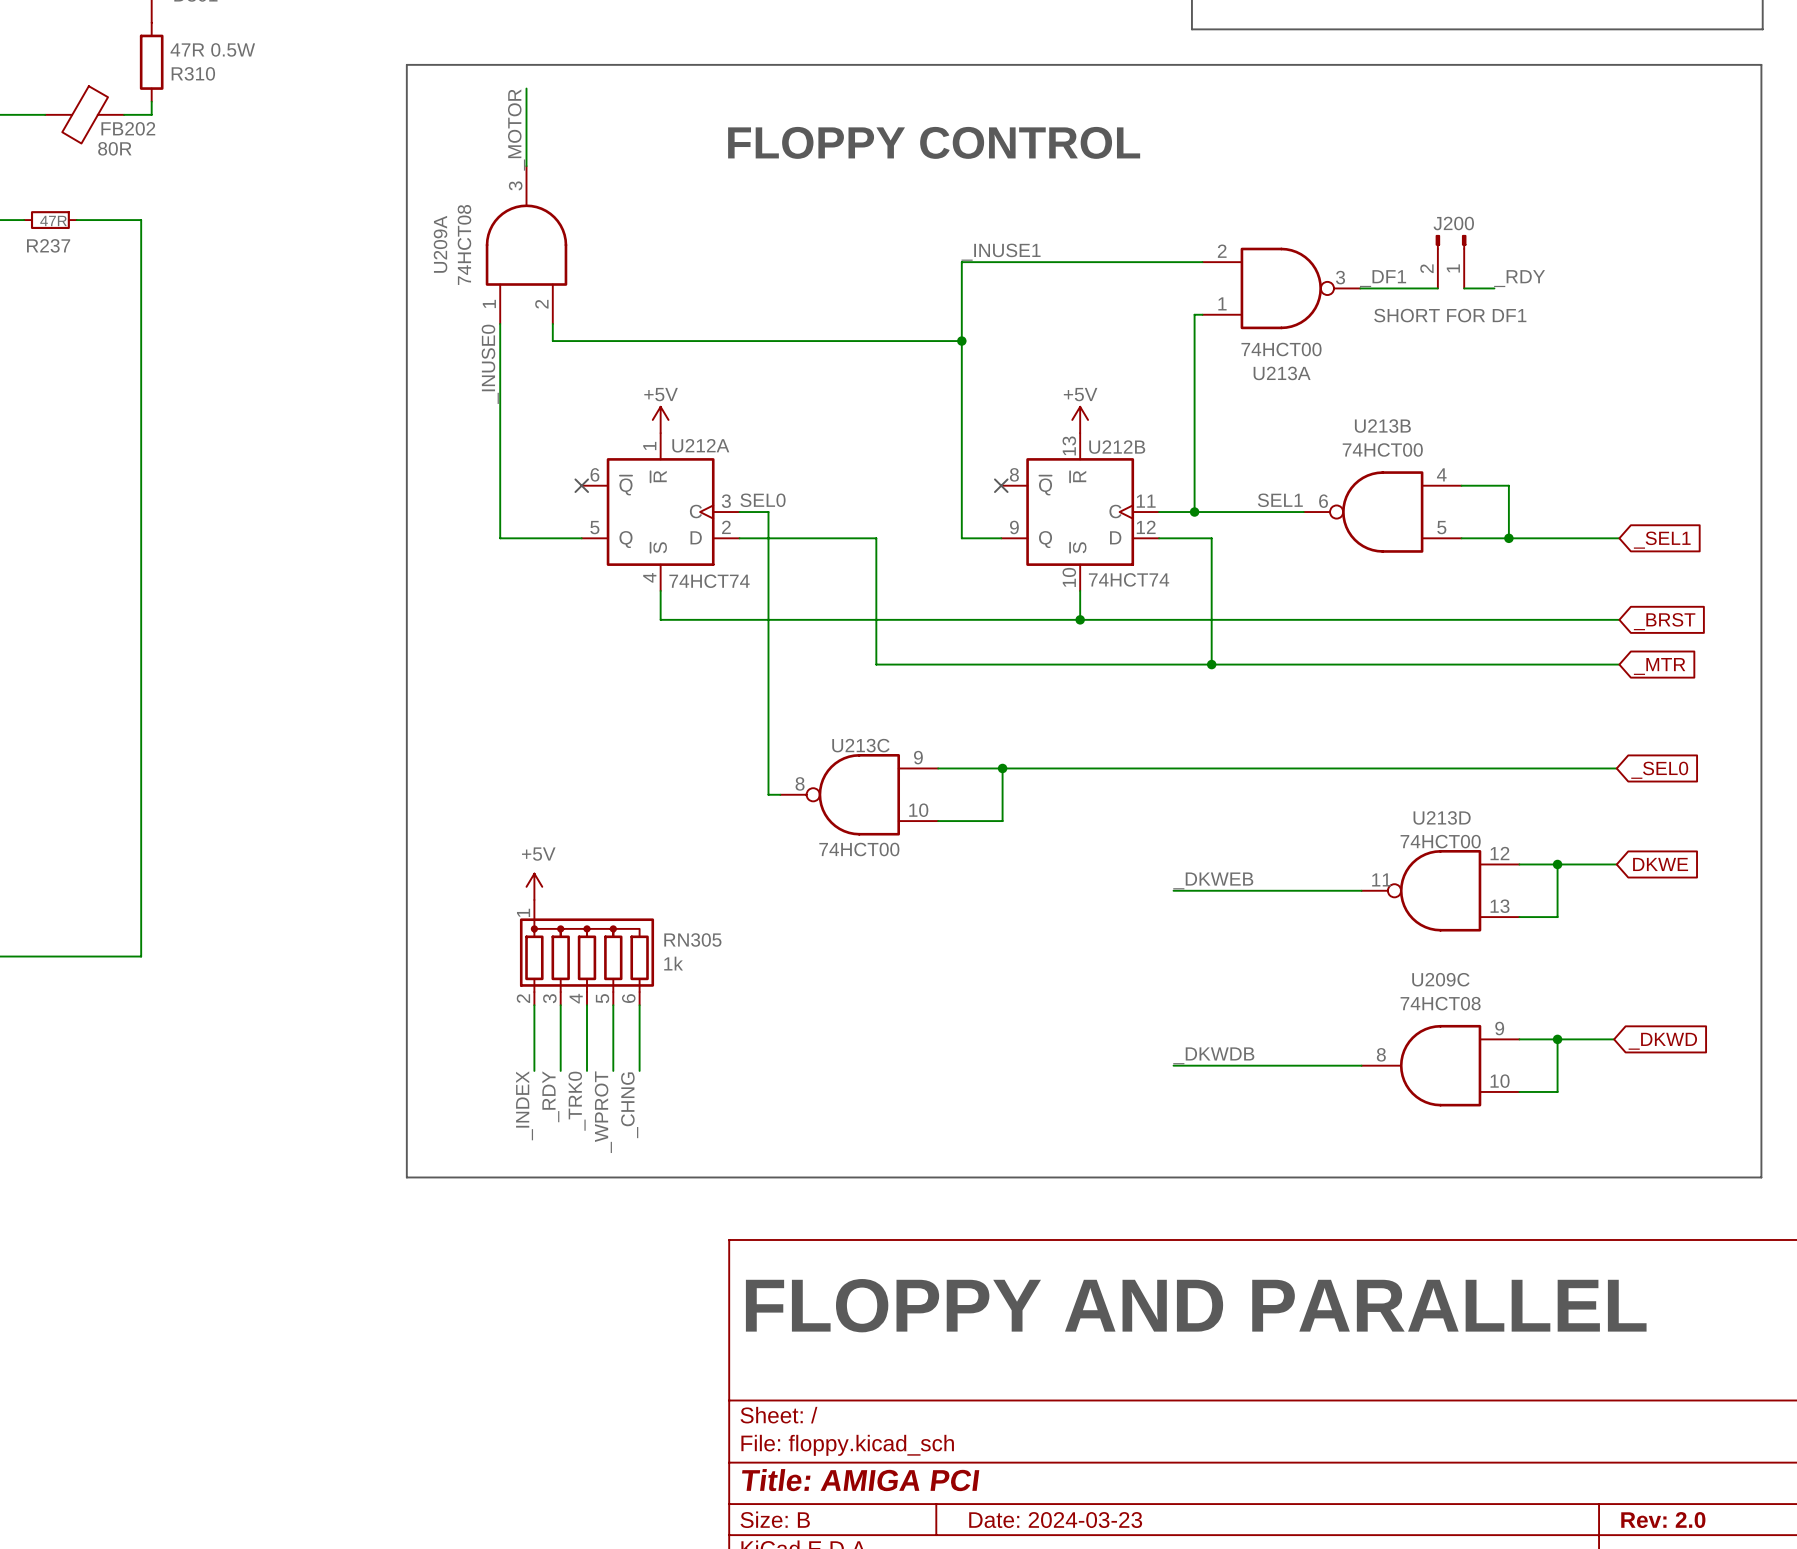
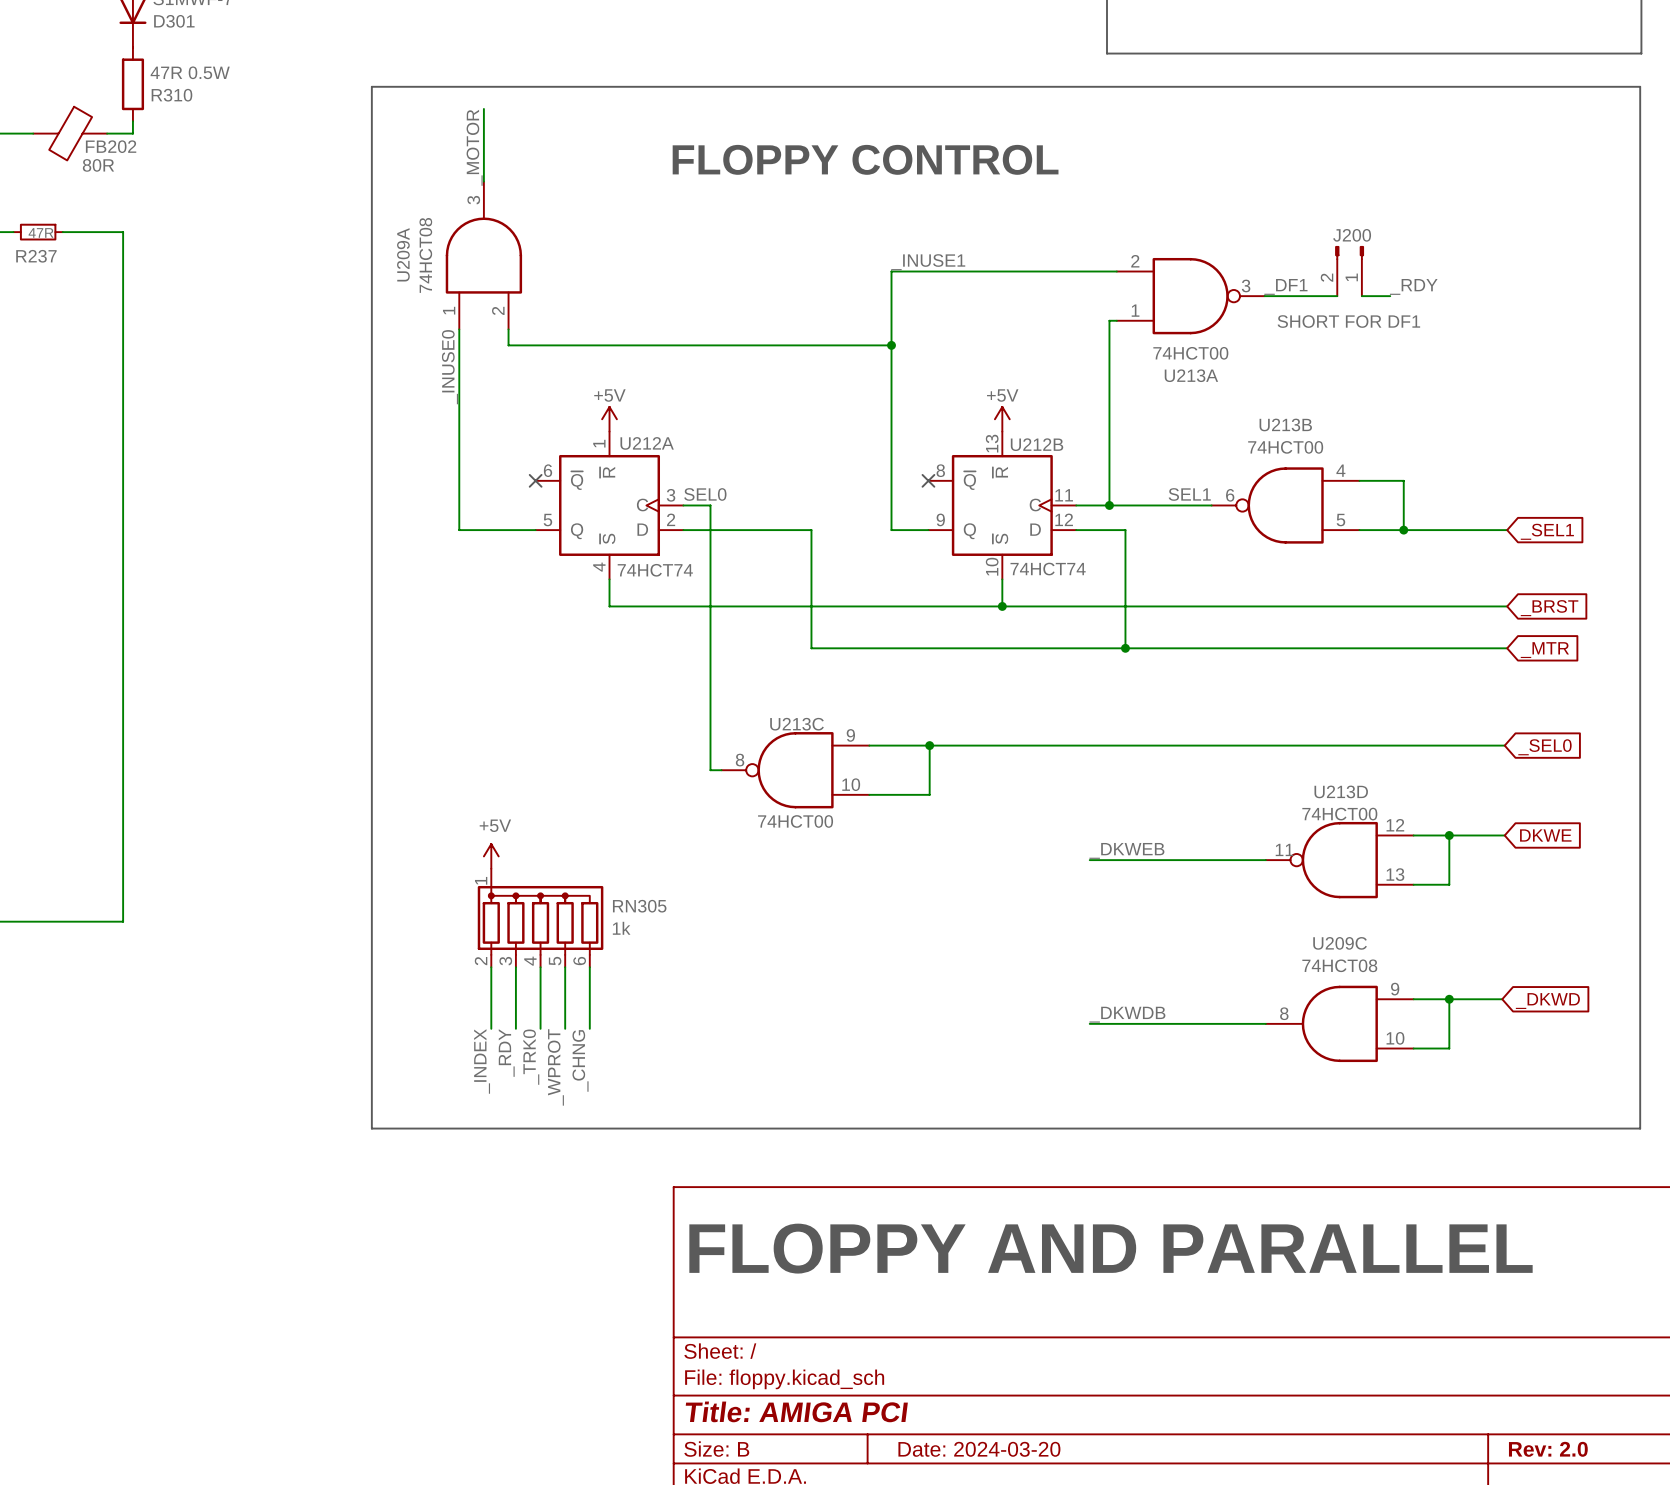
title block: Date: 2024-03-23 (1055, 1520) -> Date: 2024-03-20 (979, 1449)

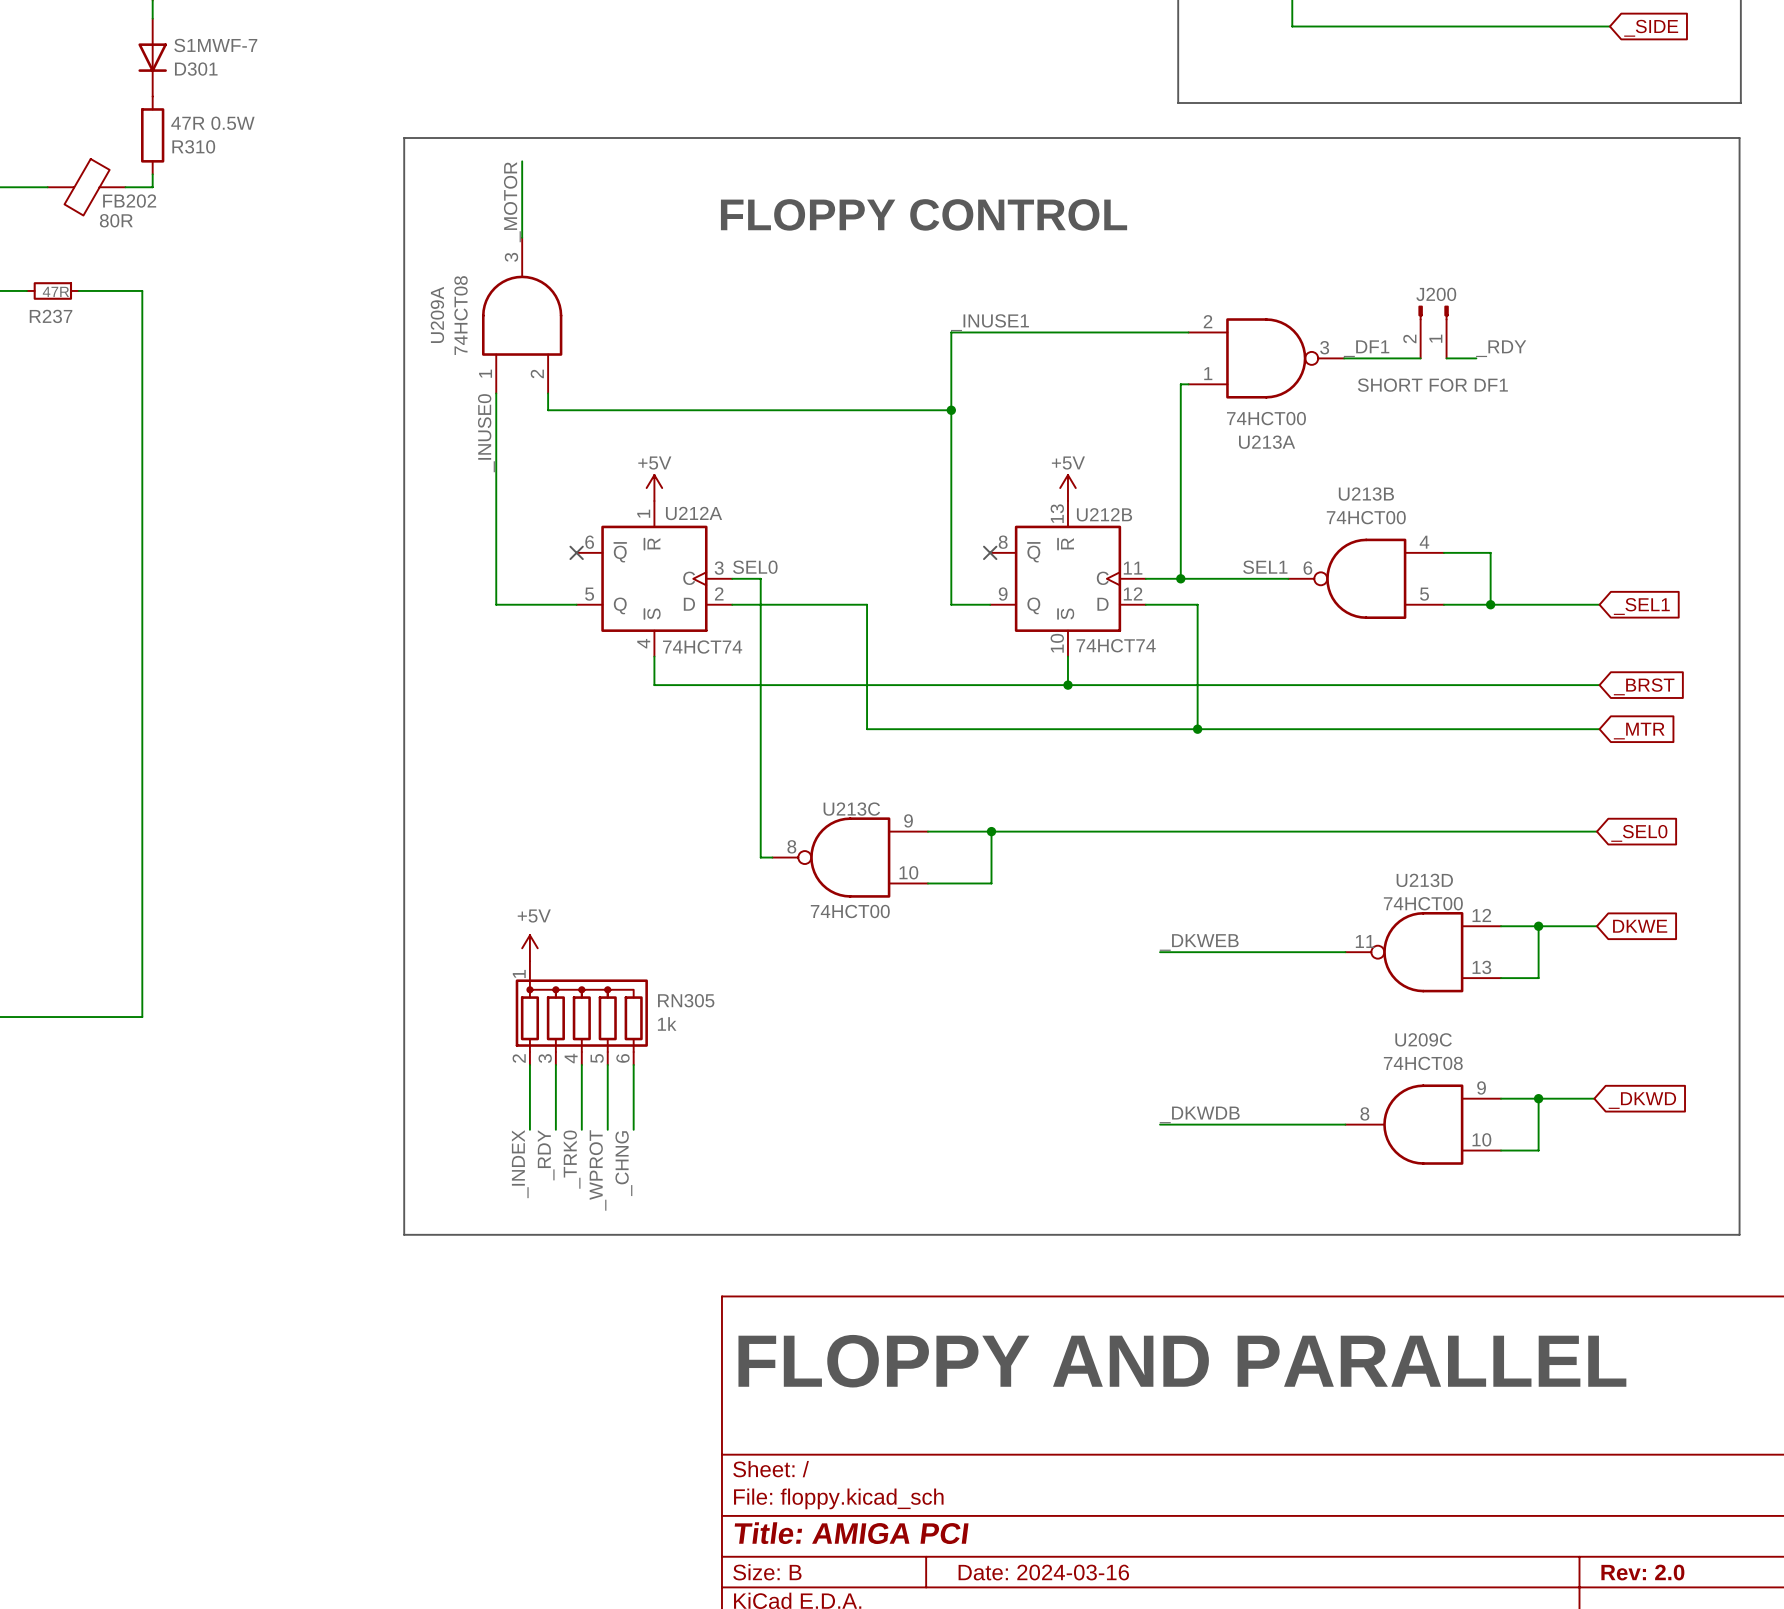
title block: Date: 2024-03-20 (979, 1449) -> Date: 2024-03-16 (1043, 1572)

